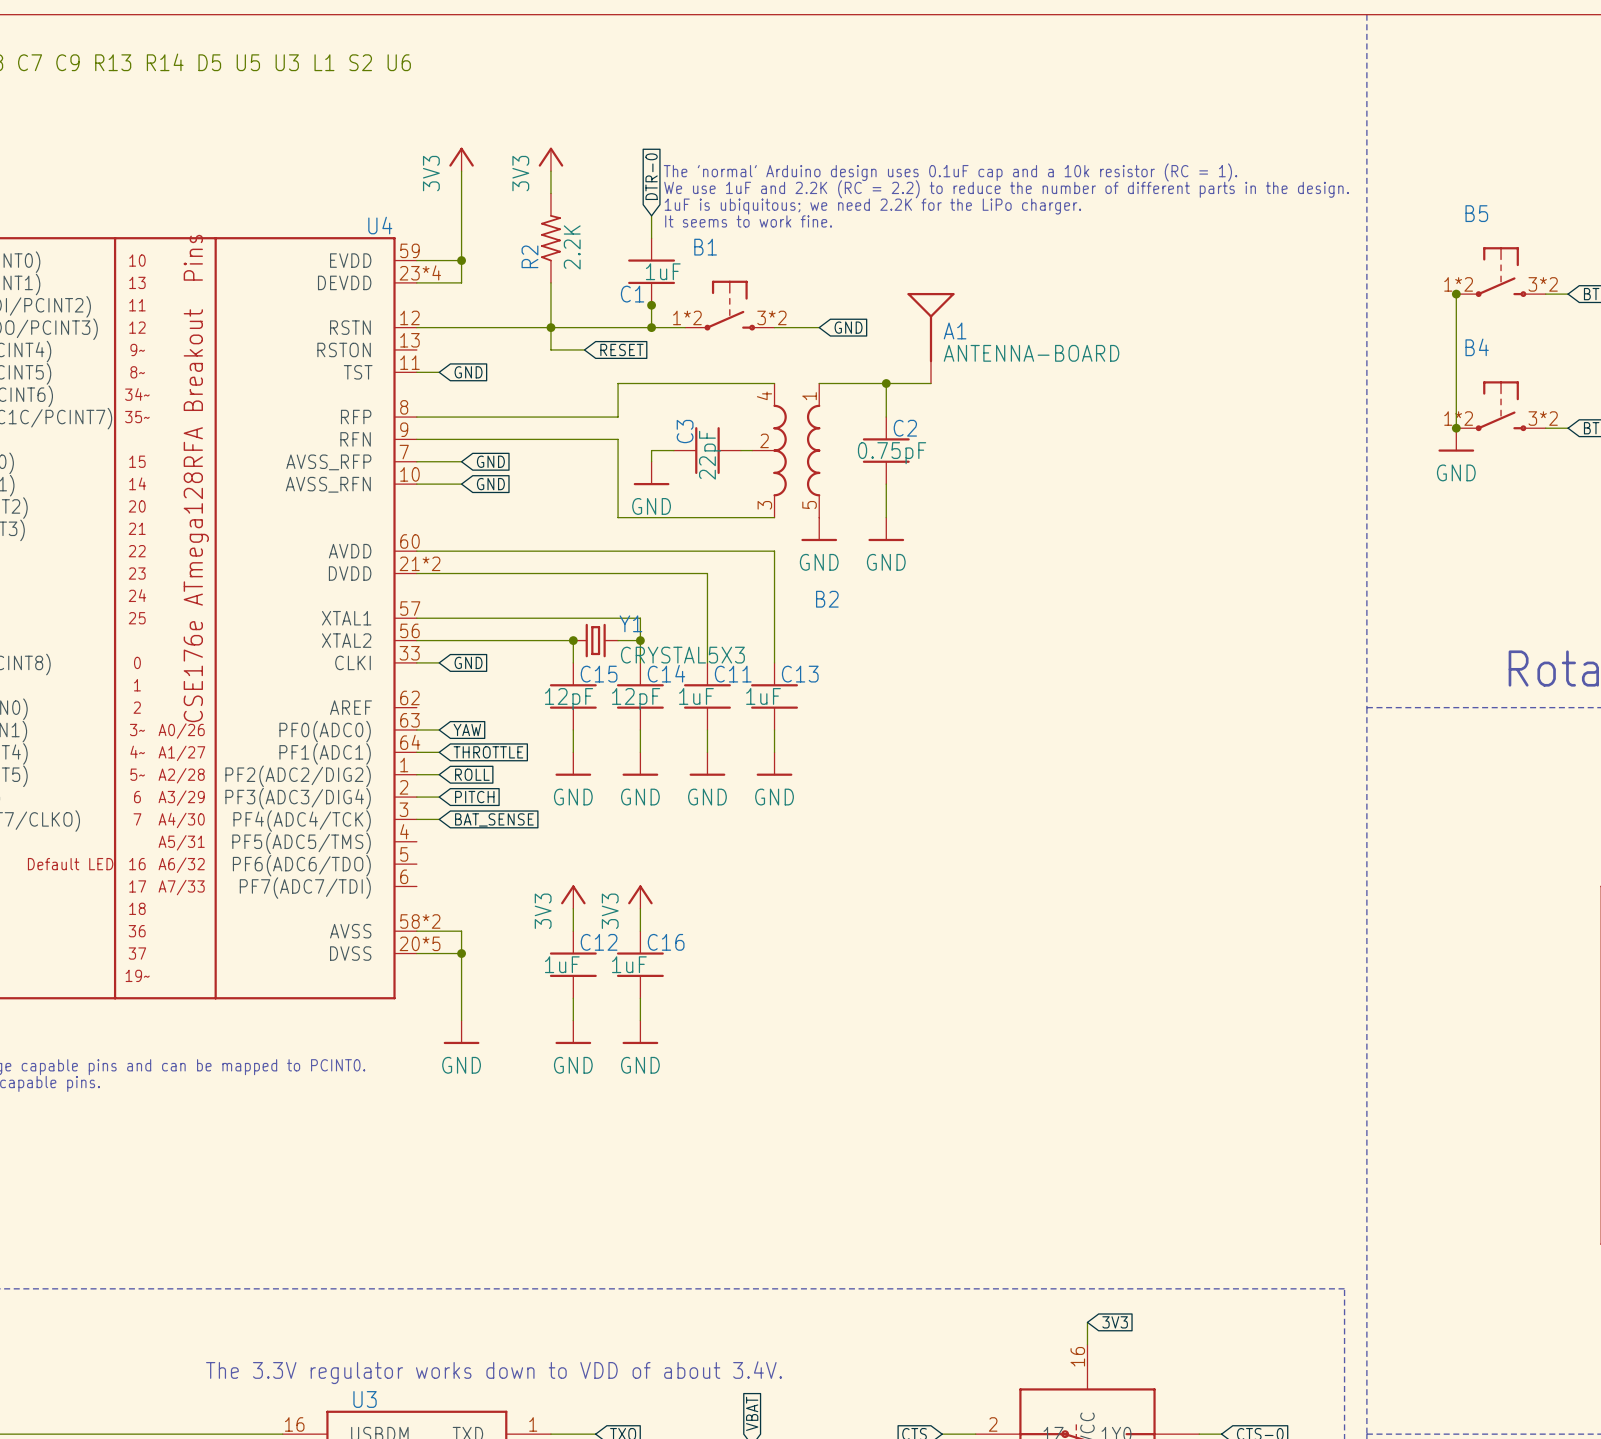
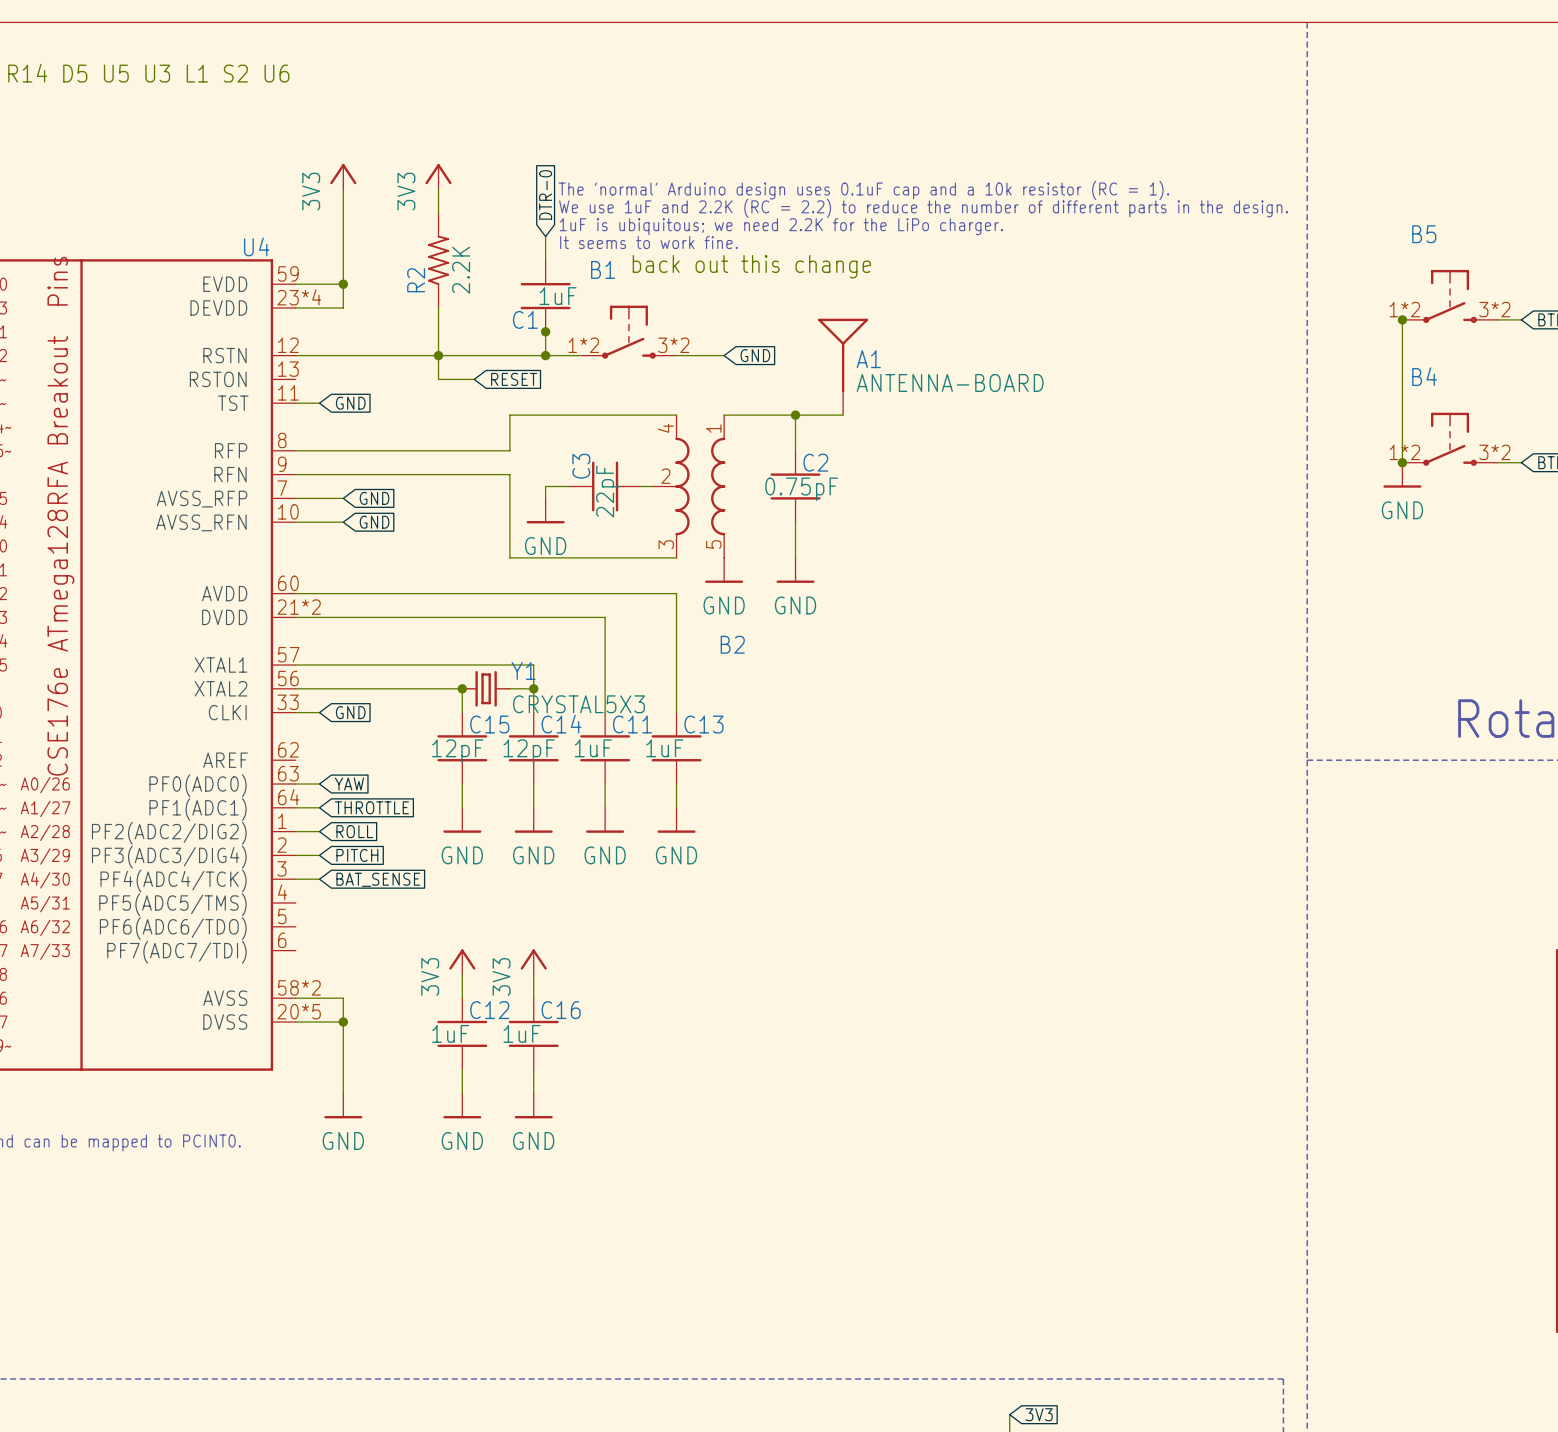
text: none -> back out this change (751, 266)

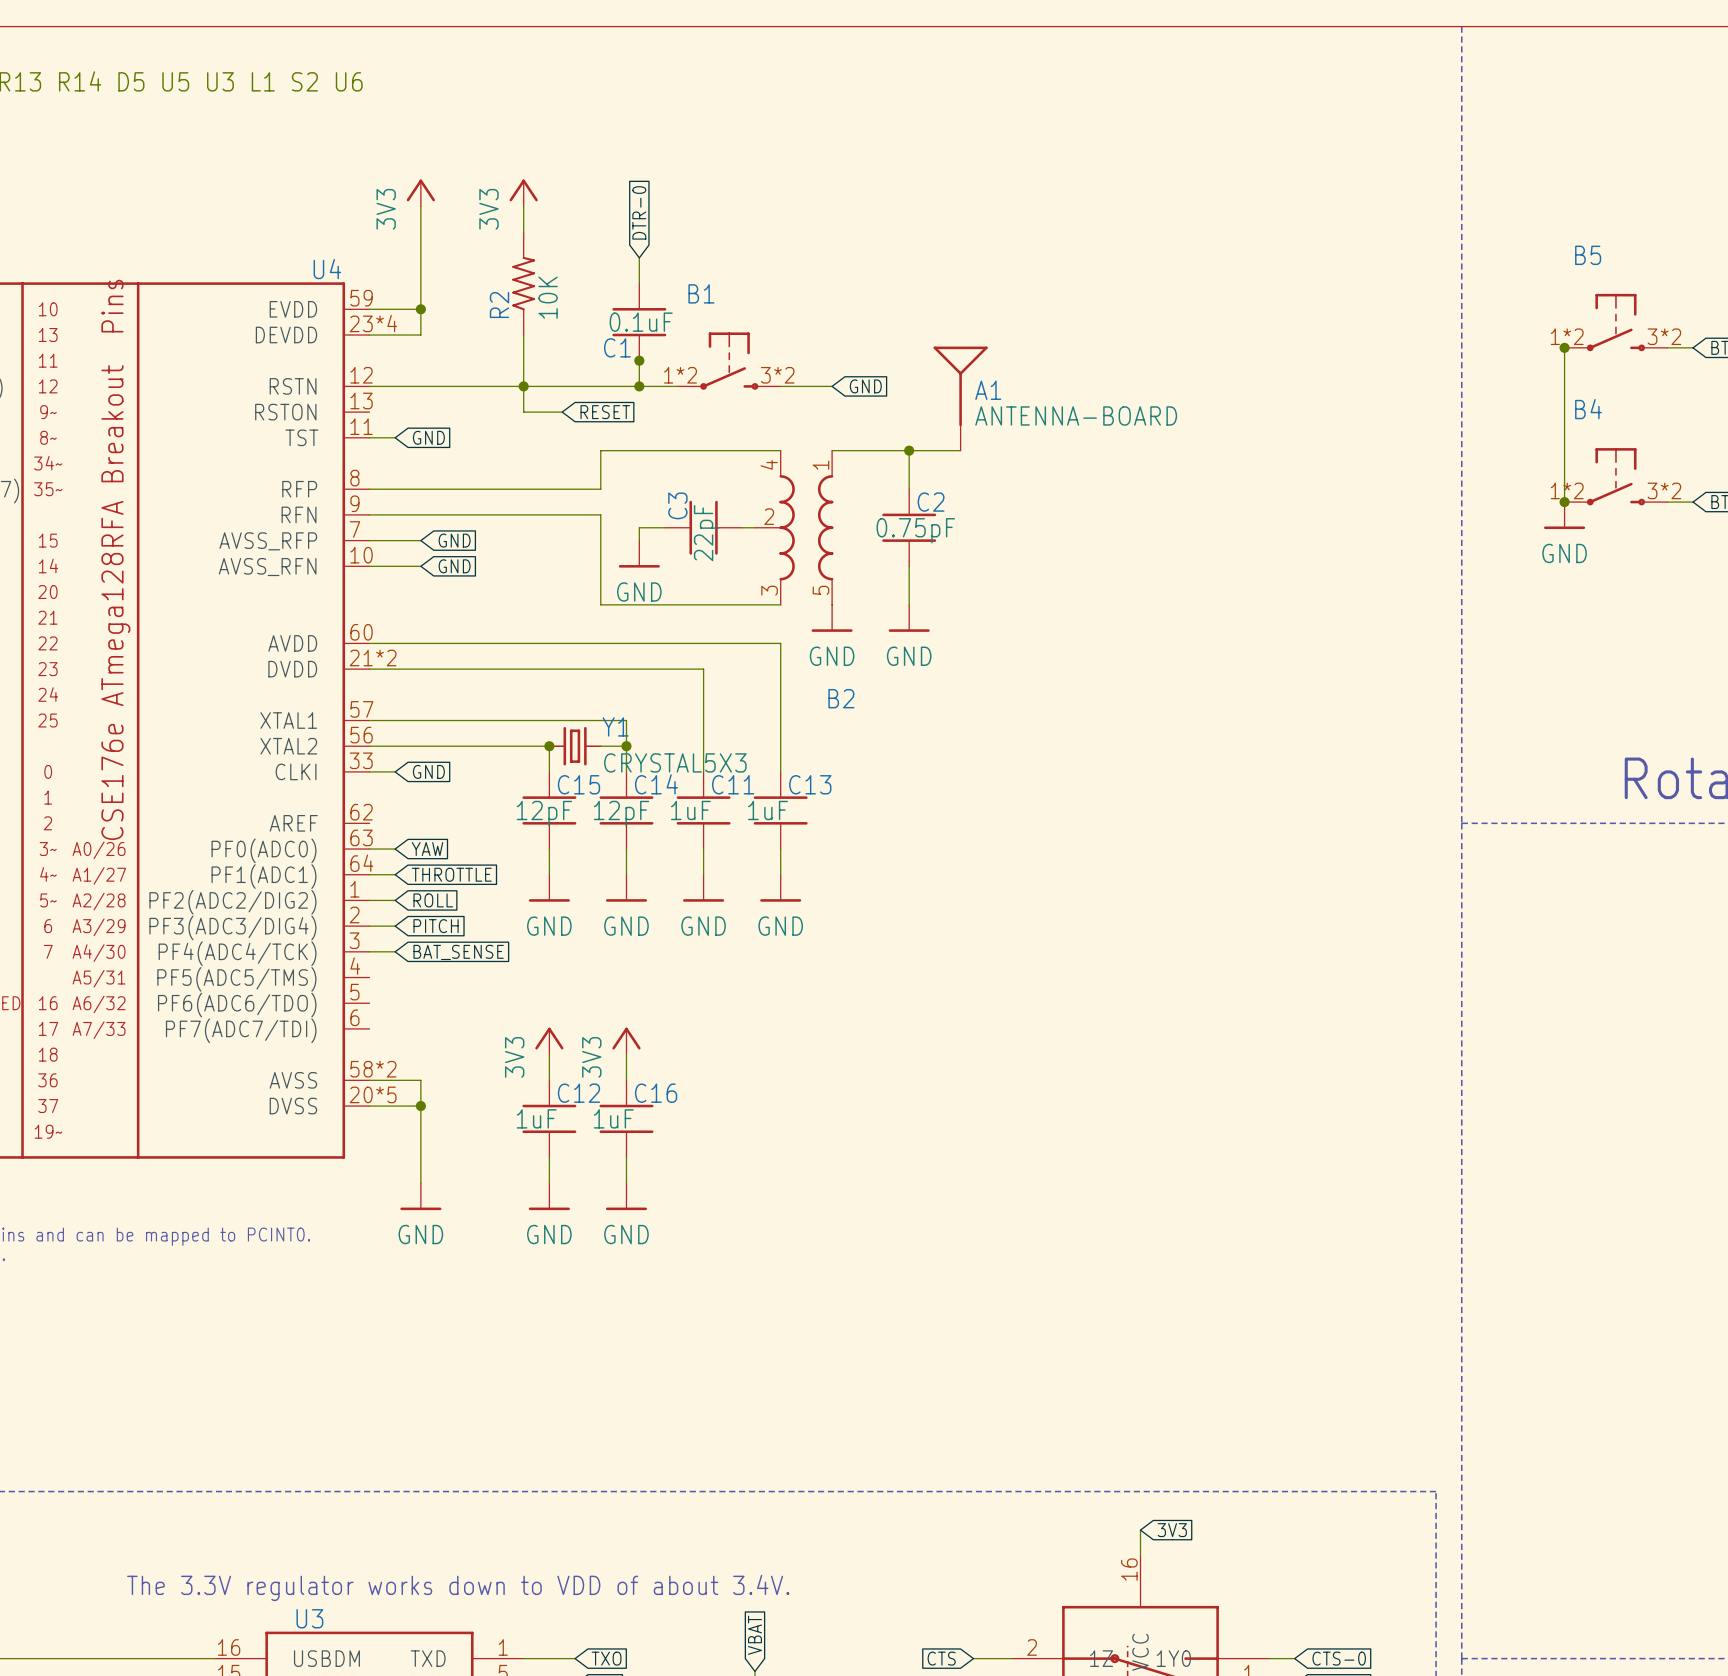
text: The 'normal' Arduino design uses 0.1uF cap and a 10k resistor (RC = 1). (863, 190) -> none
text: We use 1uF and 2.2K (RC = 2.2) to reduce the number of different parts in the design. (923, 208) -> none
text: 1uF is ubiquitous; we need 2.2K for the LiPo charger. (781, 226) -> none
text: It seems to work fine. (648, 242) -> none
text: back out this change (751, 266) -> none
R2 value: 2.2K (461, 270) -> 10K (548, 297)
C1 value: 1uF (558, 296) -> 0.1uF (641, 322)

